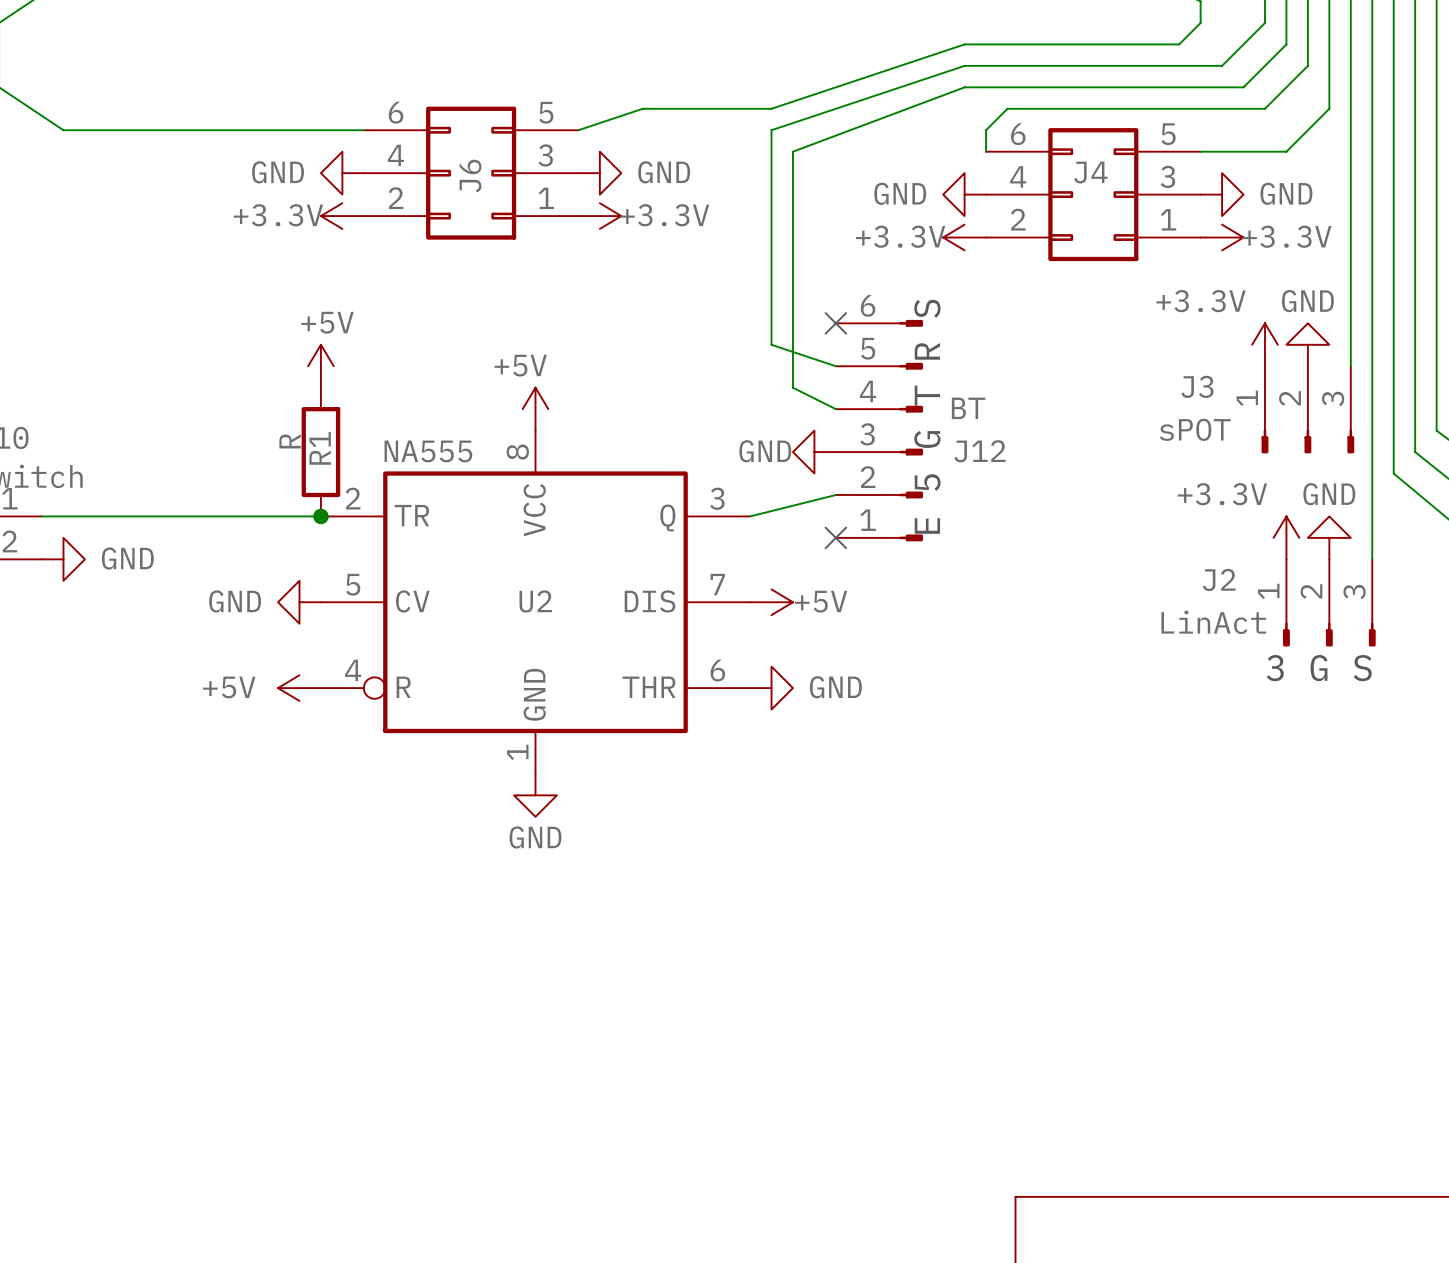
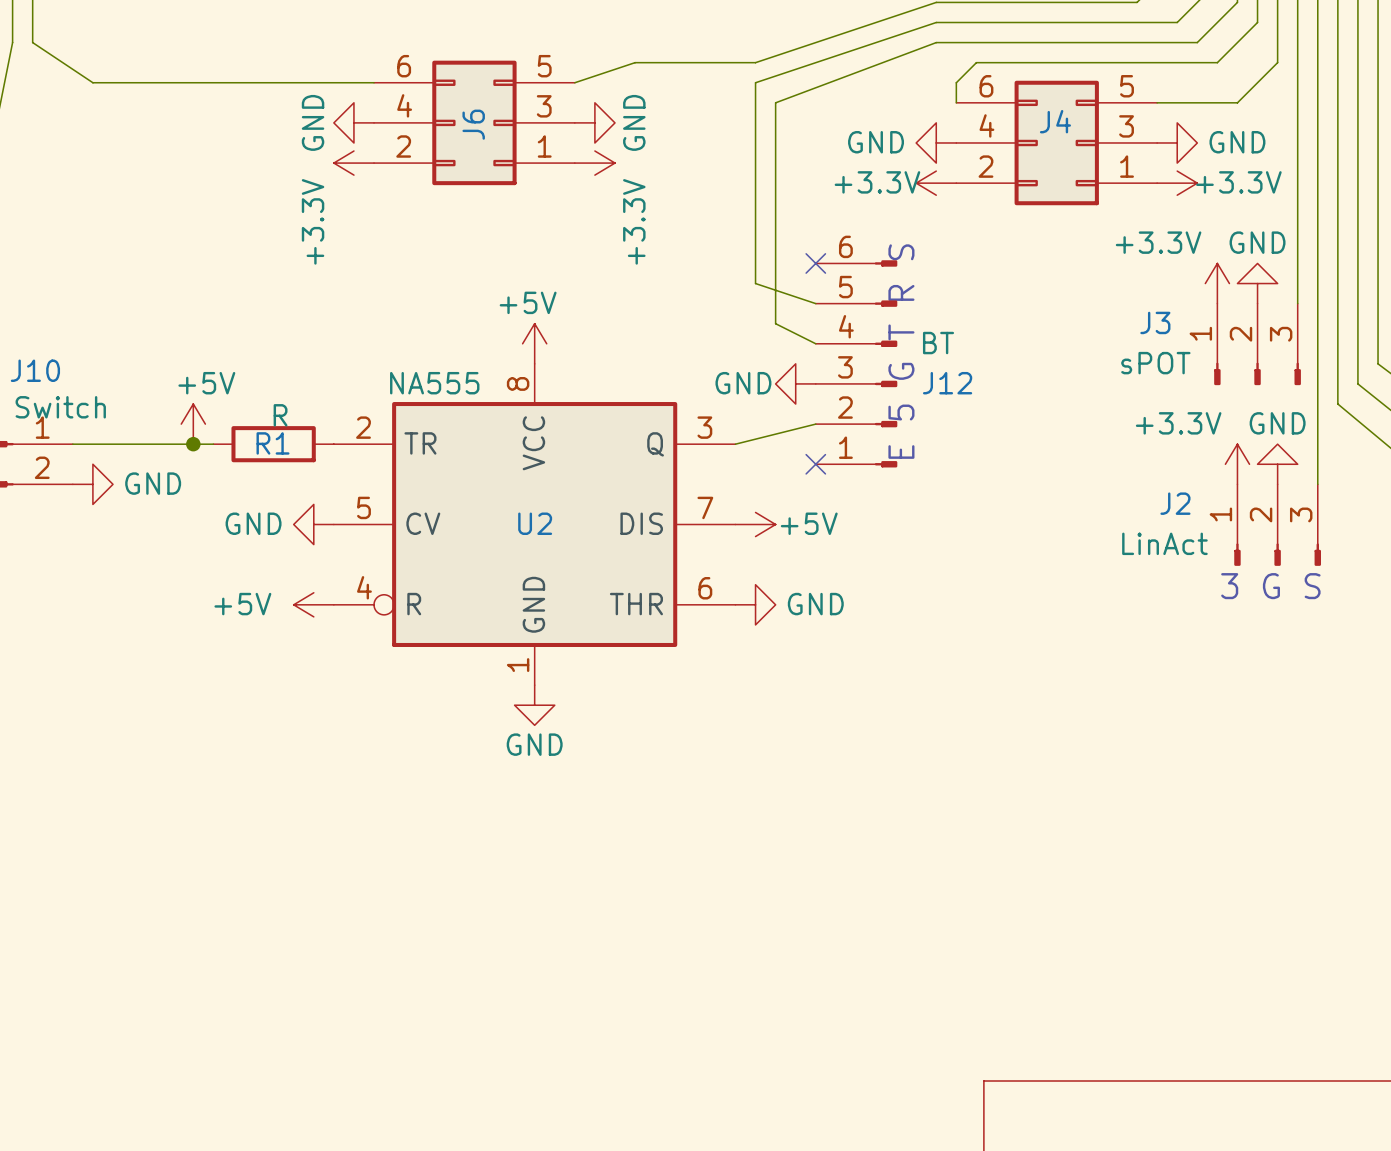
power symbol text rotation: 0° (278, 172) -> 90° counterclockwise (313, 122)
power symbol text rotation: 0° (664, 172) -> 90° counterclockwise (634, 122)
power symbol text rotation: 0° (278, 215) -> 90° counterclockwise (313, 221)
power symbol text rotation: 0° (664, 215) -> 90° counterclockwise (634, 221)
power symbol position: +5V (320, 366) -> +5V (193, 424)
R1 rotation: 0° (320, 452) -> 90° clockwise (273, 444)
R1 position: (320, 452) -> (273, 444)
junction: none -> (193, 444)
wire: (192, 516) (320, 516) -> none
junction: (320, 516) -> none

